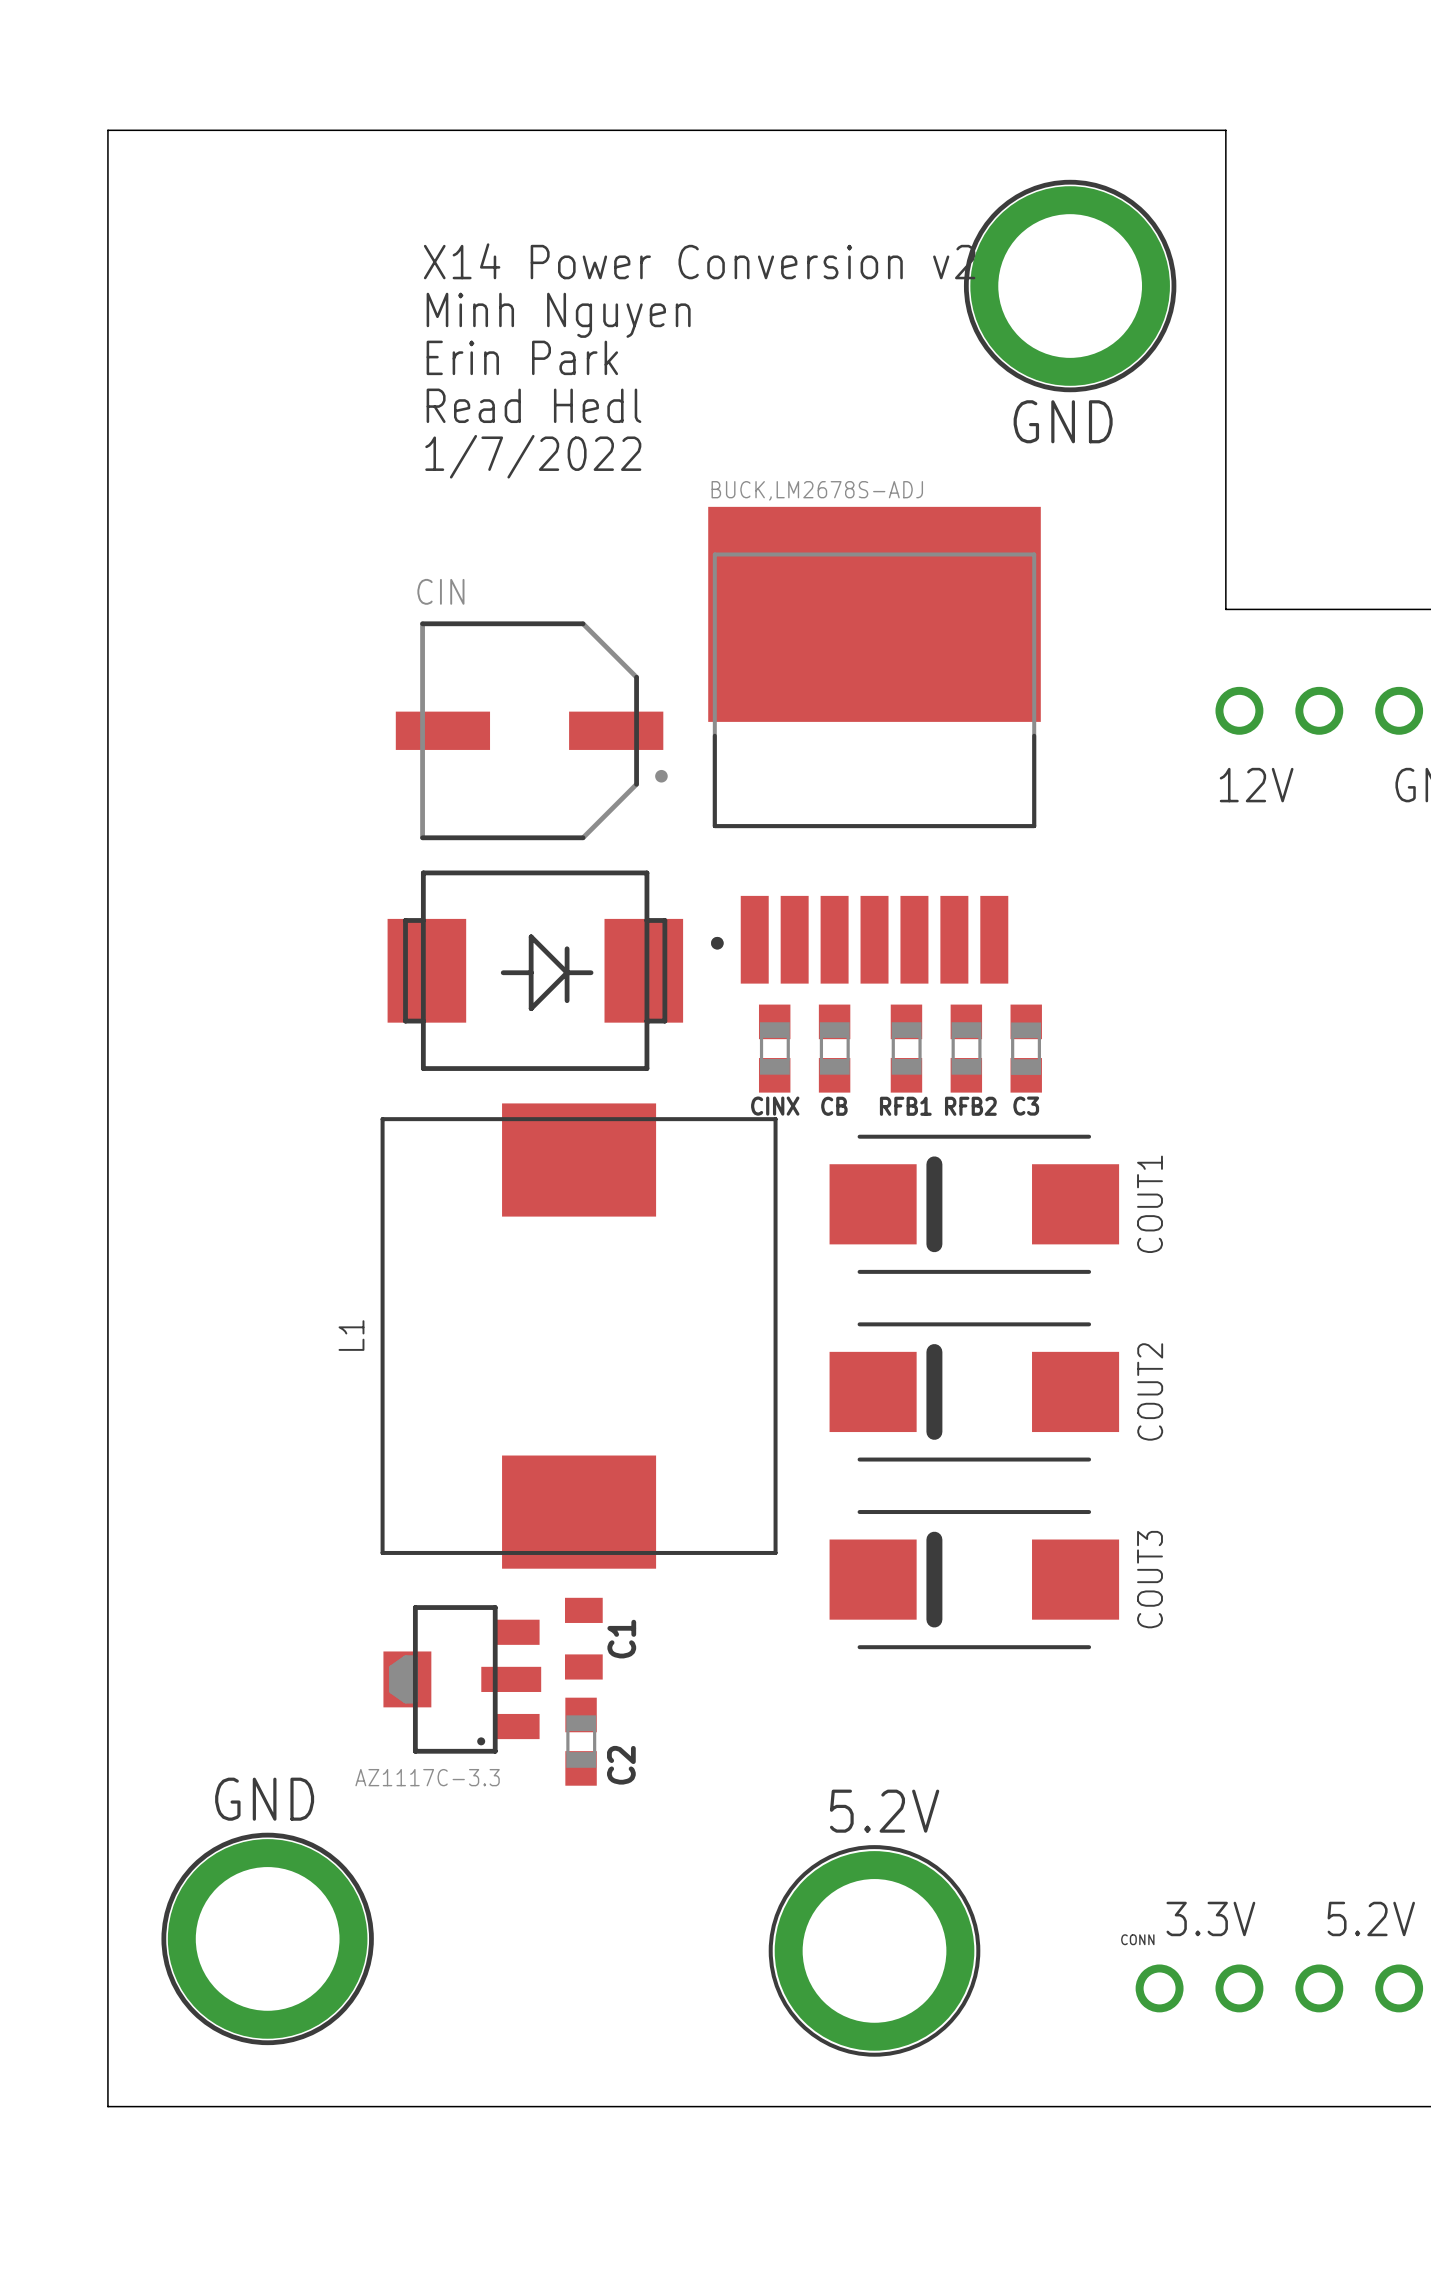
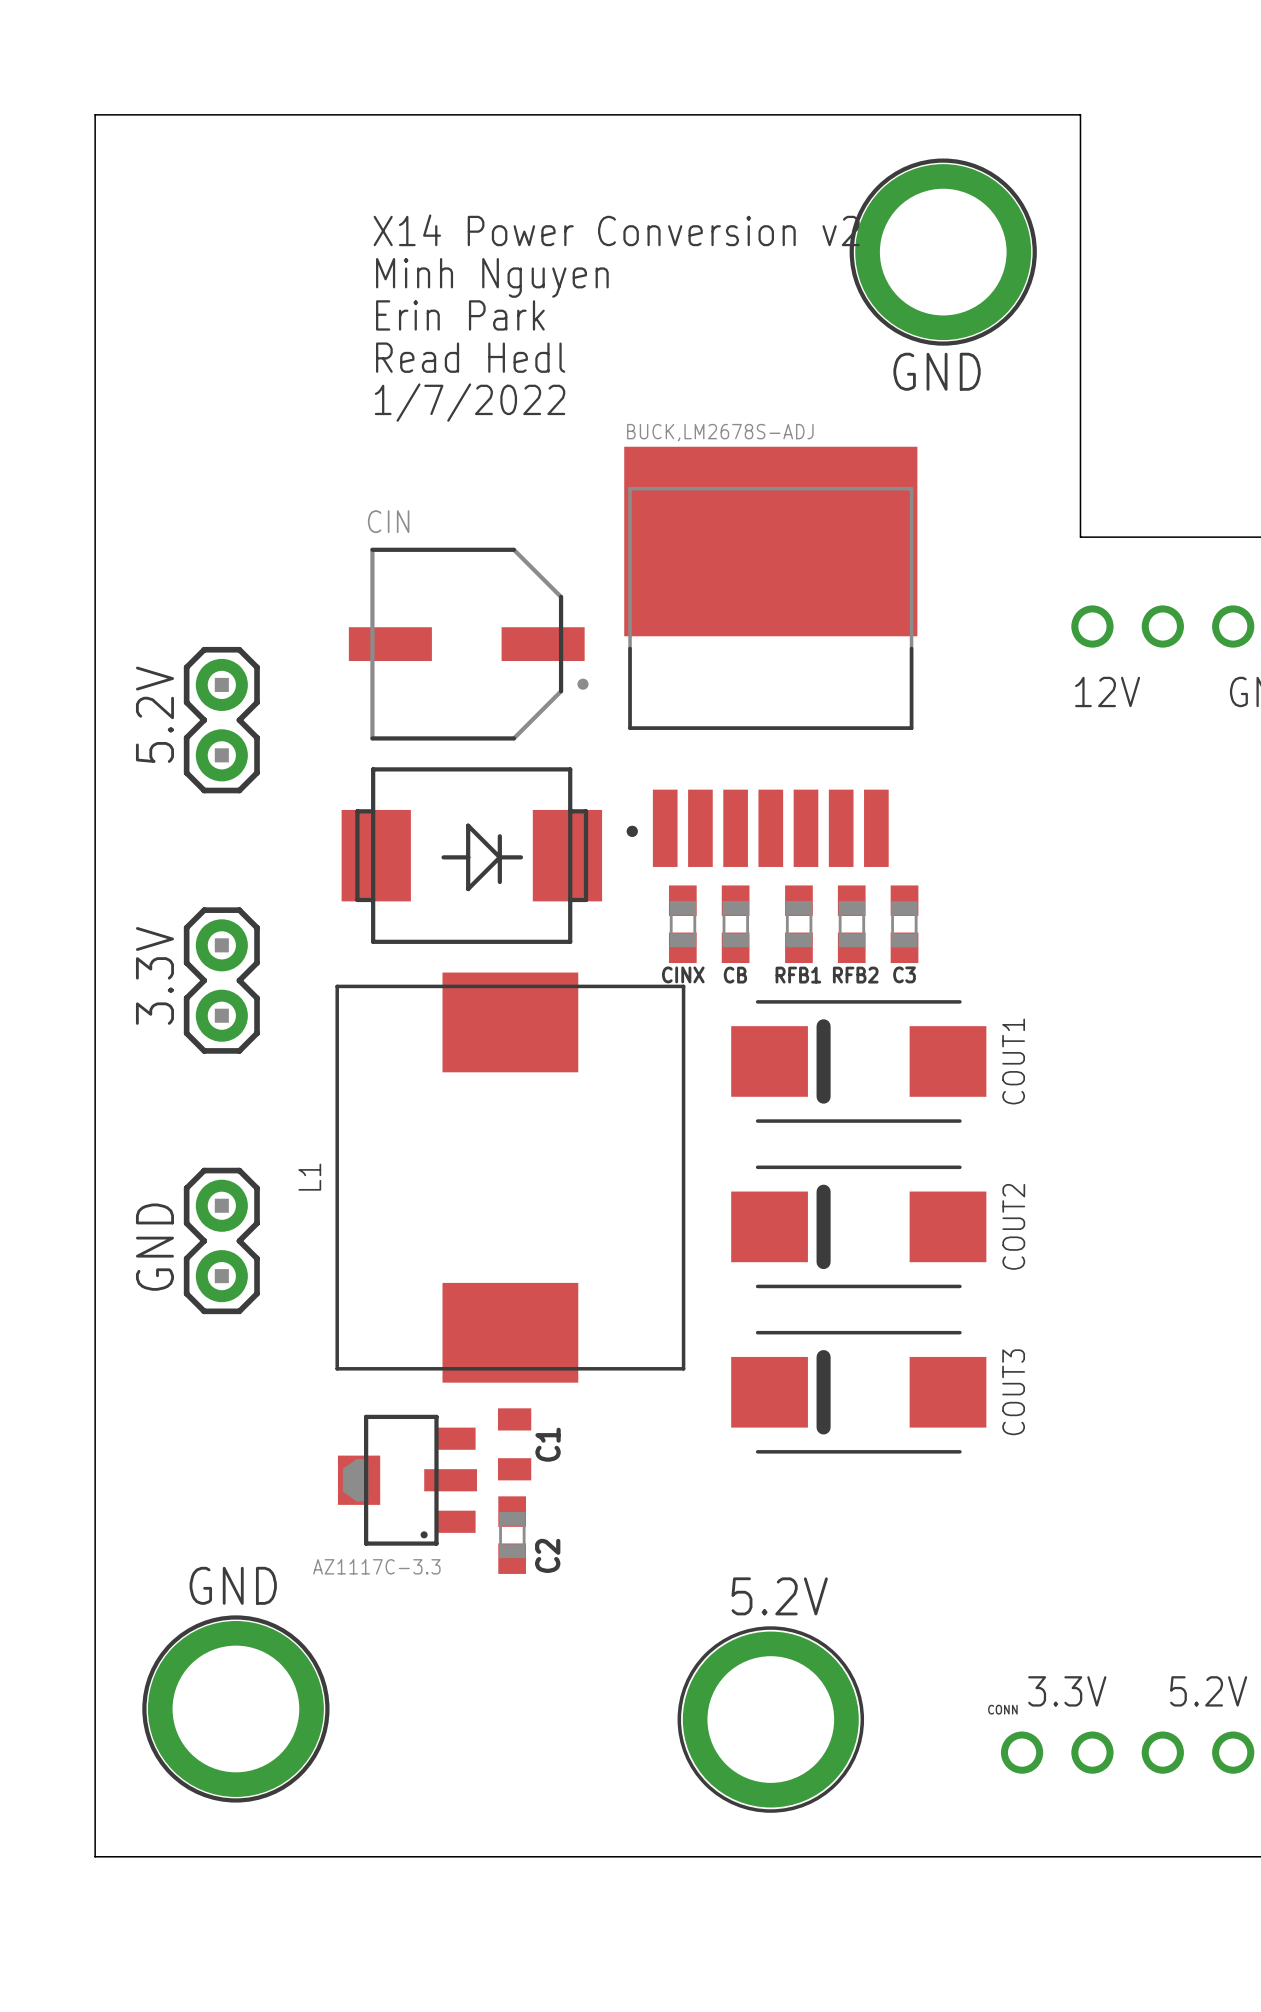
text: none -> 5.2V (154, 714)
part: none -> (221, 720)
text: none -> 3.3V (154, 975)
part: none -> (221, 980)
part: none -> (221, 1240)
text: none -> GND (154, 1247)

